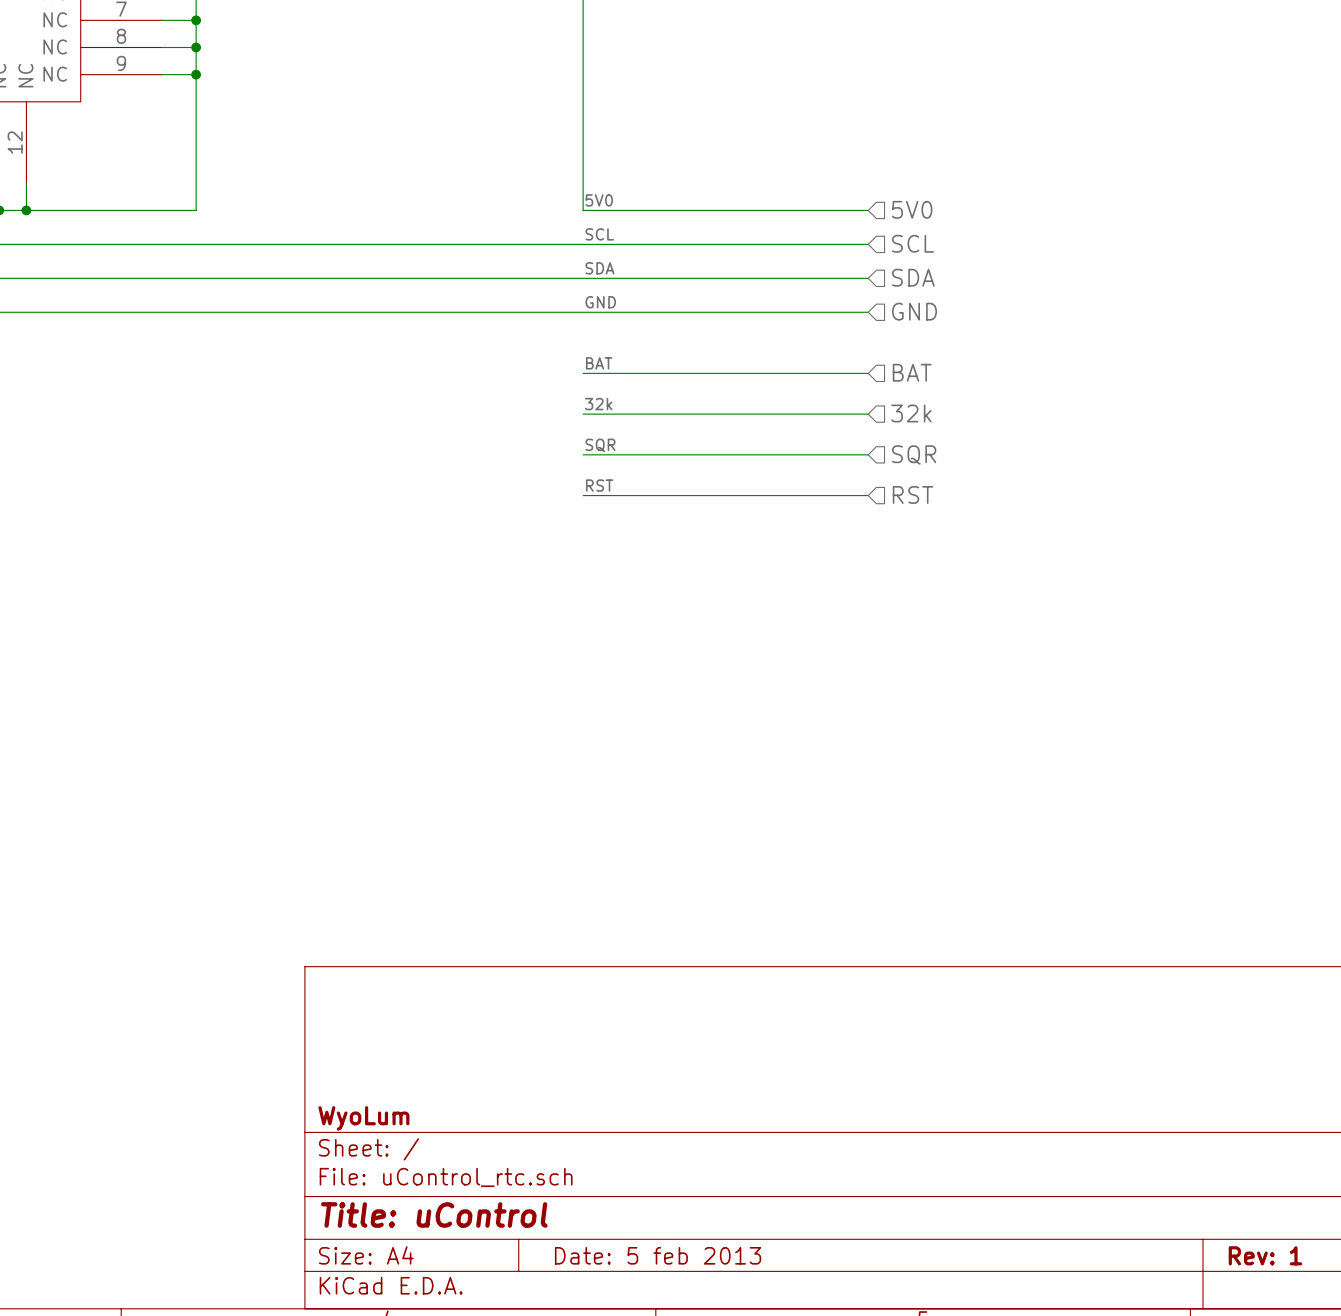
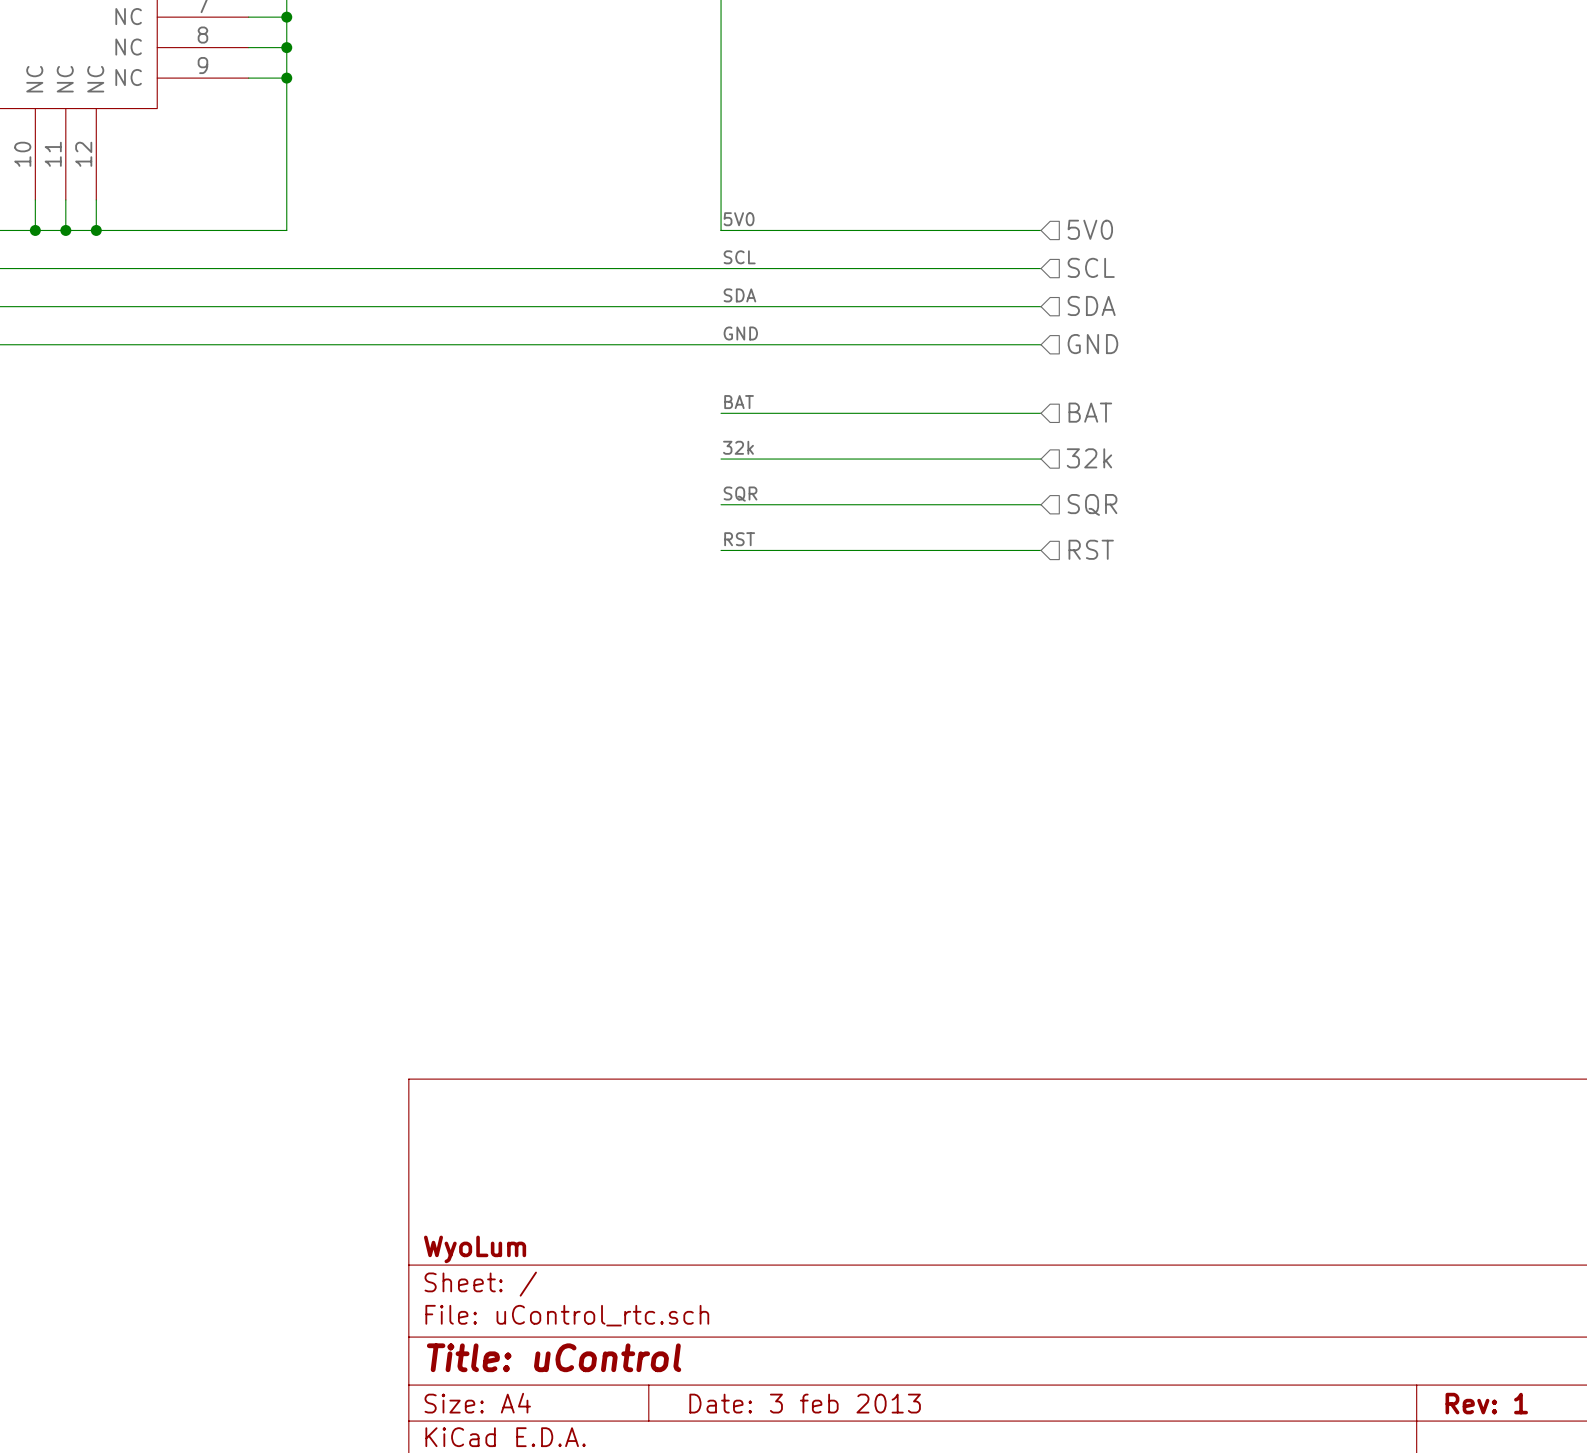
title block: Date: 5 feb 2013 (658, 1255) -> Date: 3 feb 2013 (805, 1403)

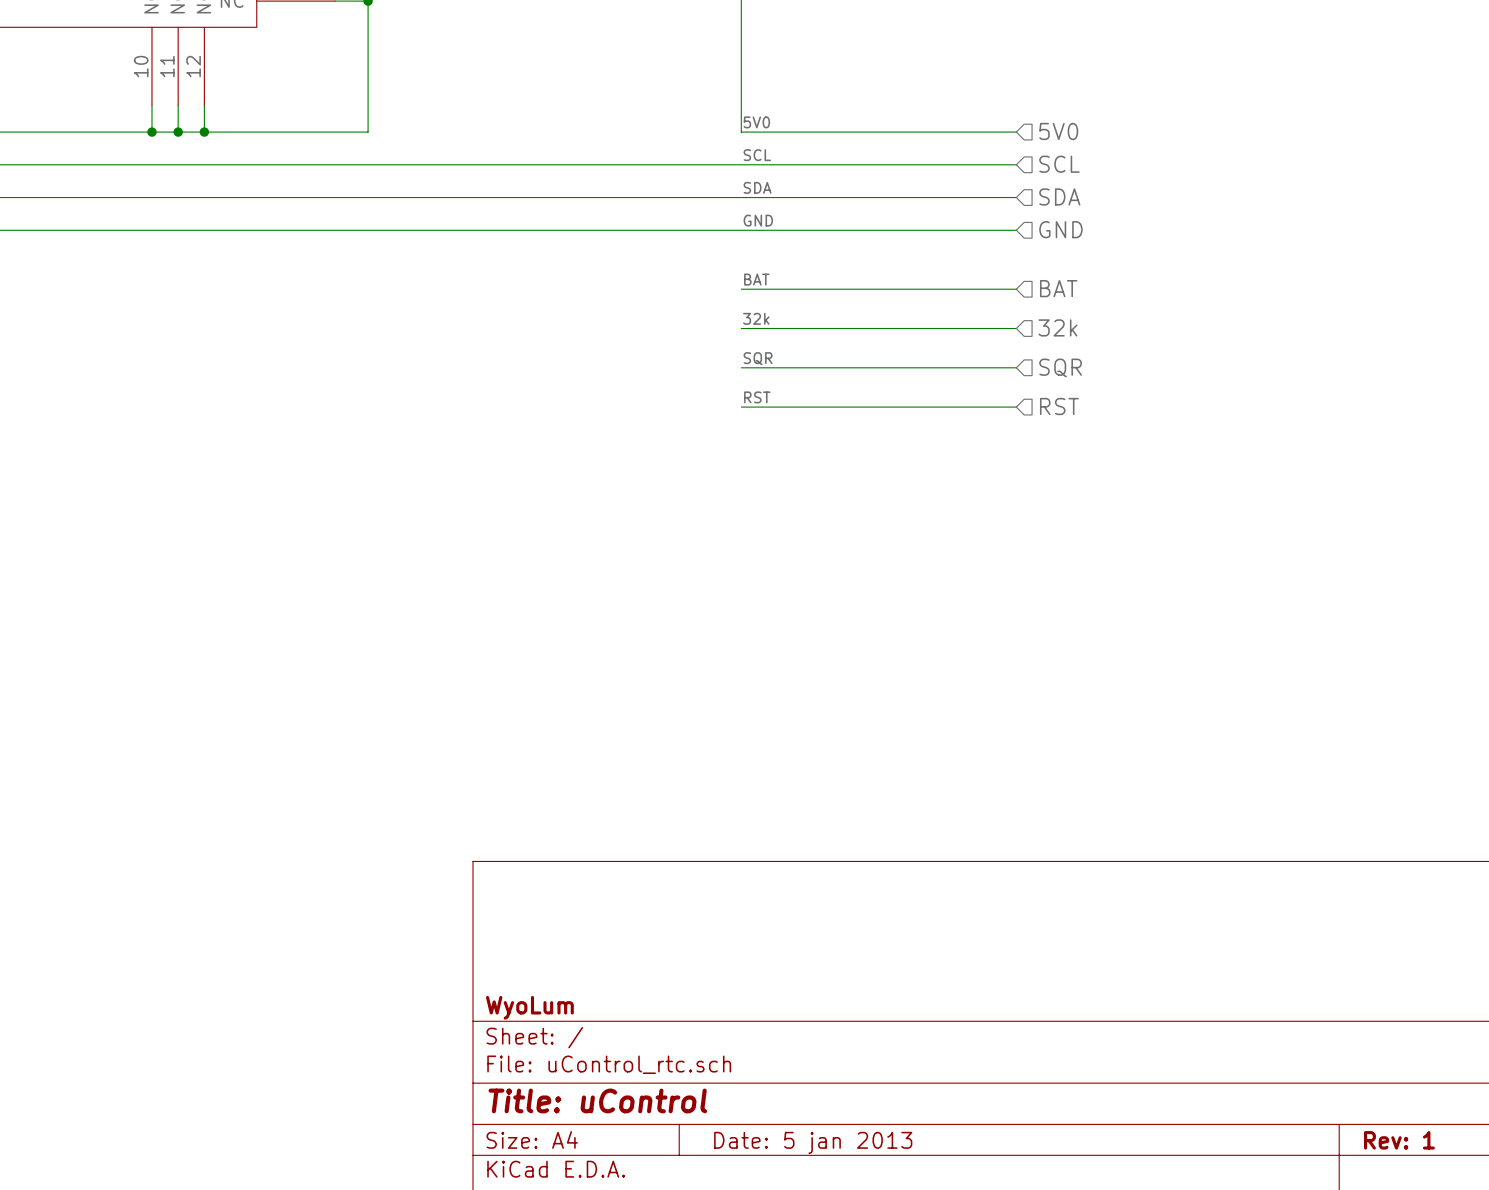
title block: Date: 3 feb 2013 (805, 1403) -> Date: 5 jan 2013 (813, 1142)

